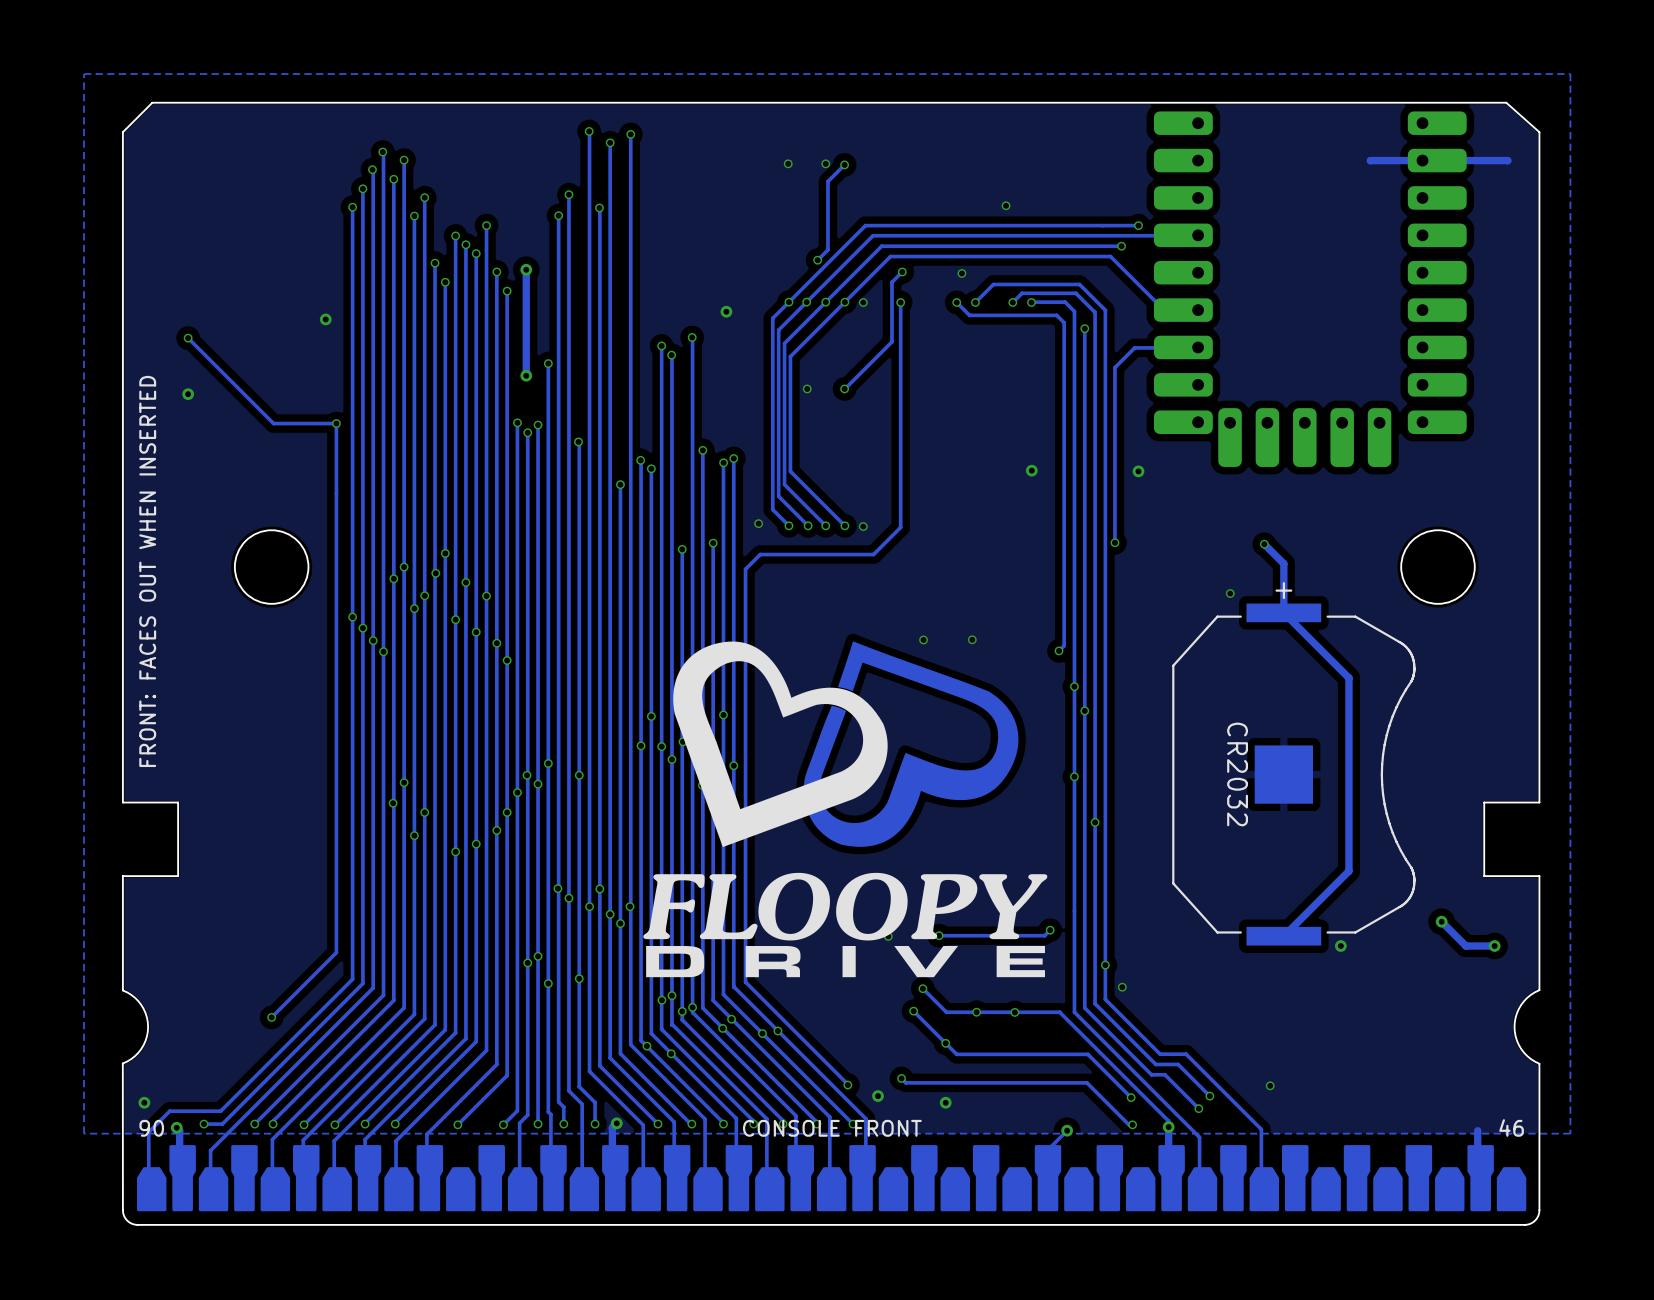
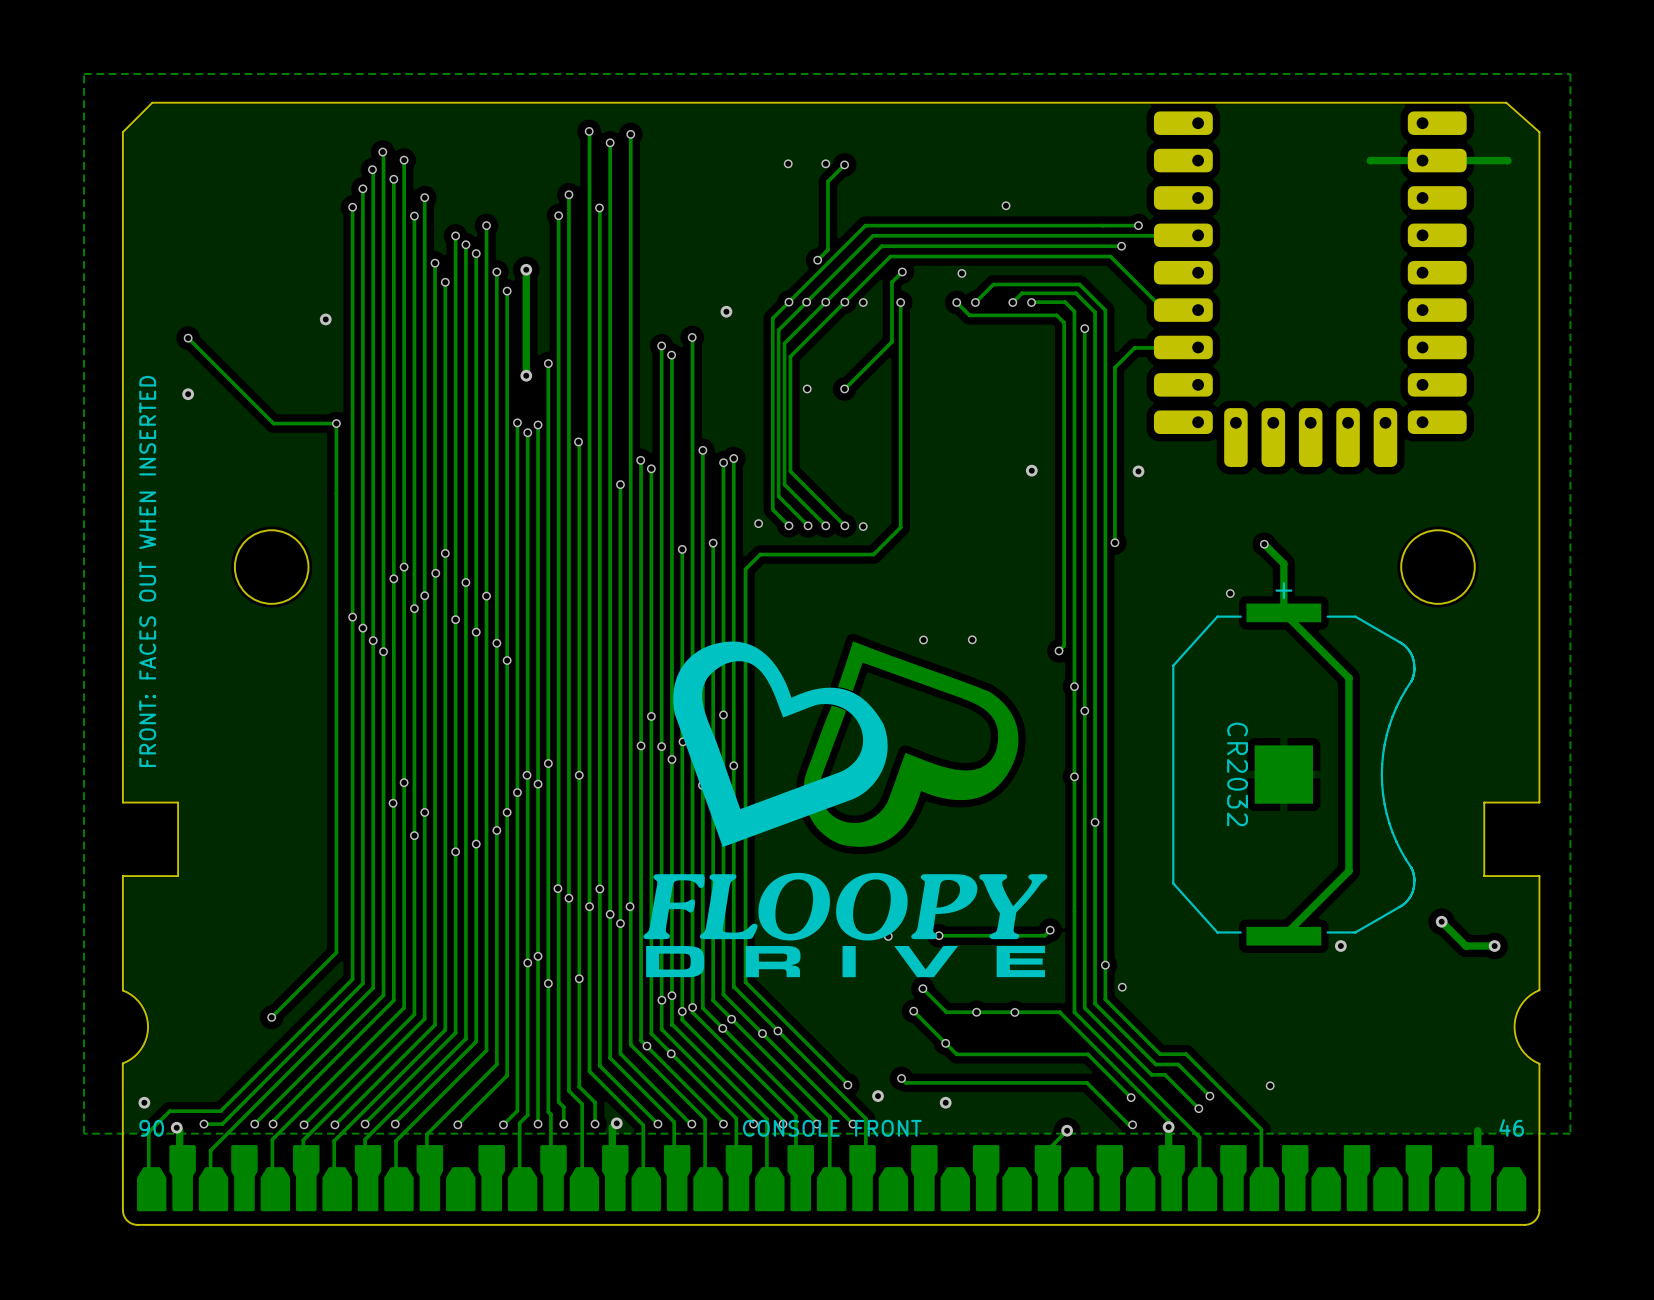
part footprint: [1153, 111, 1467, 467] -> [1153, 111, 1467, 467]

